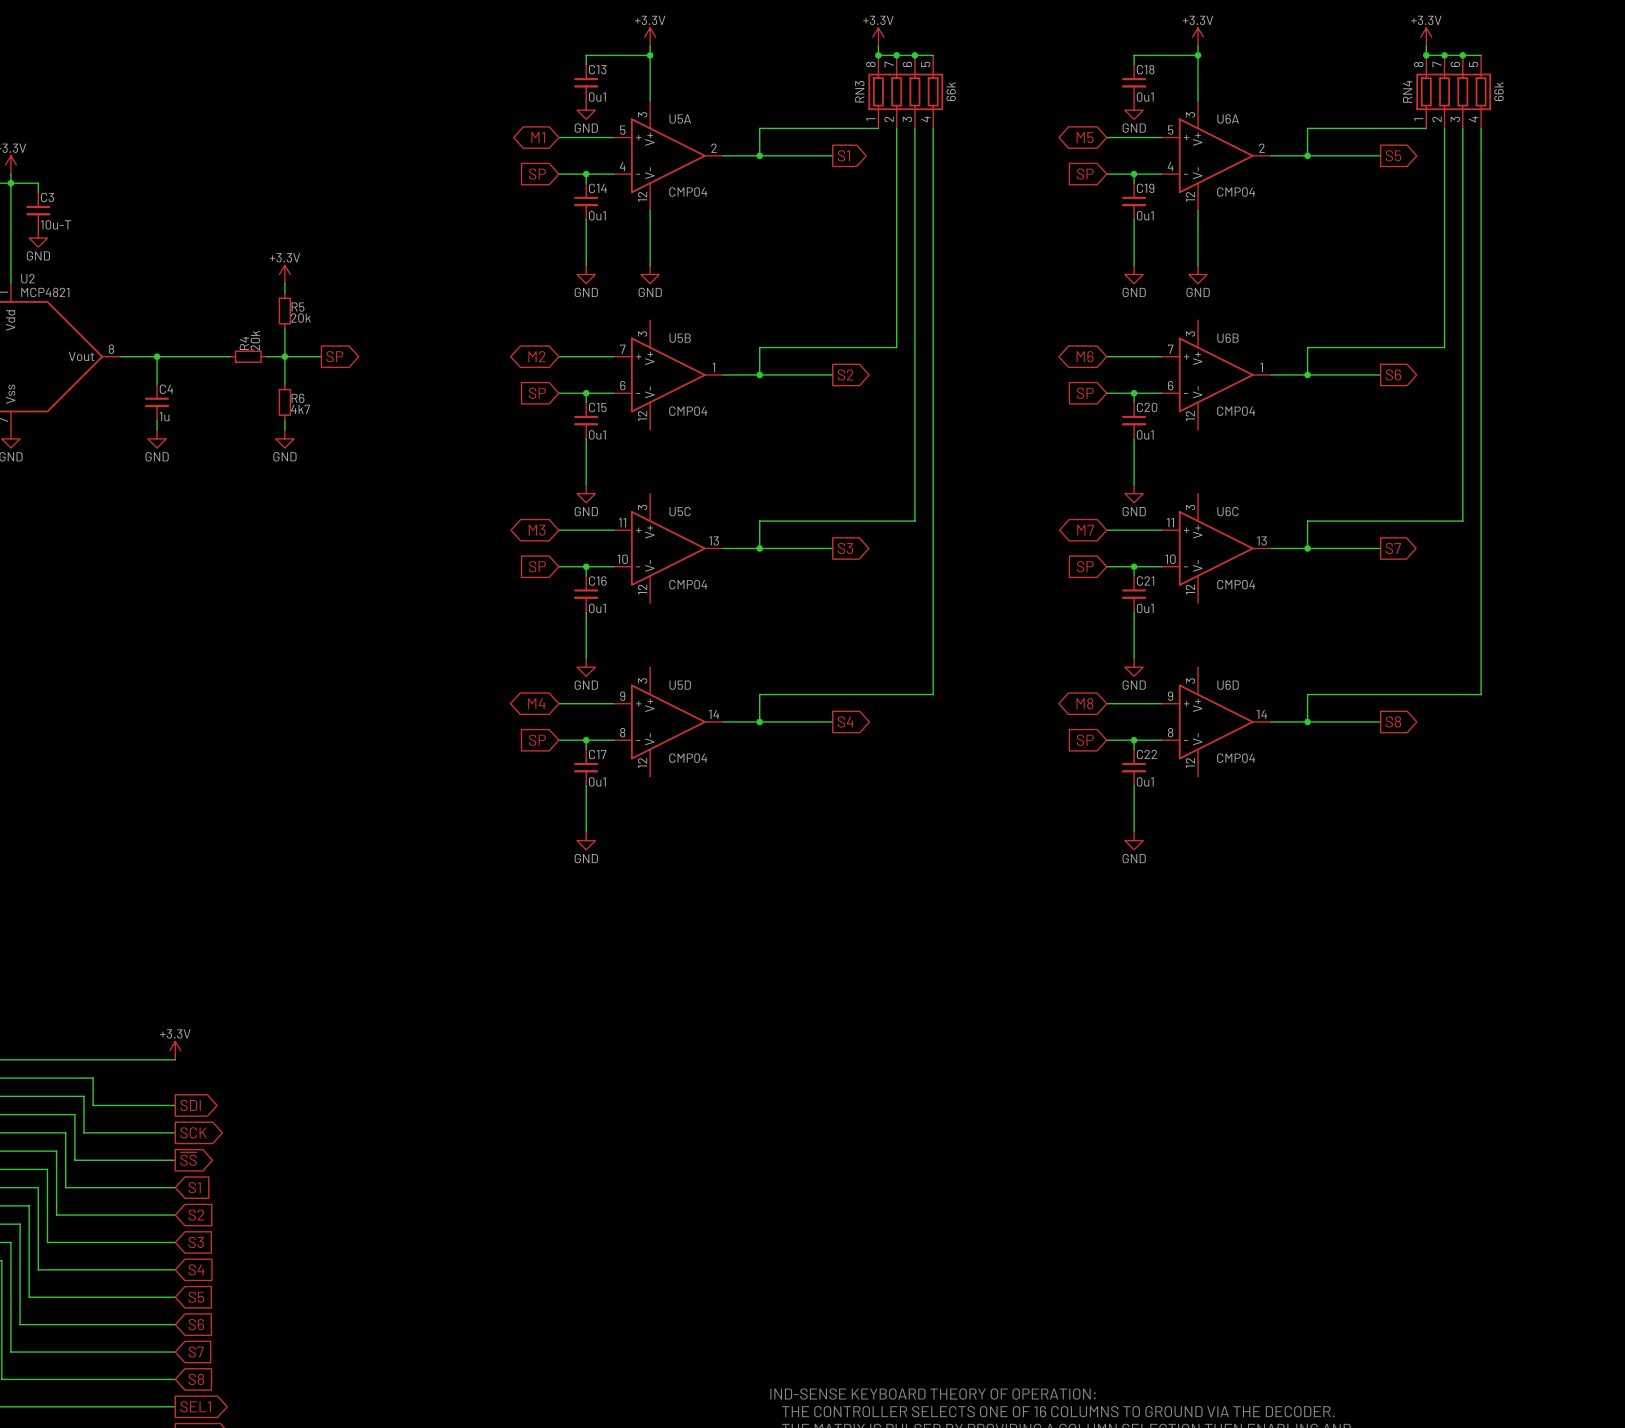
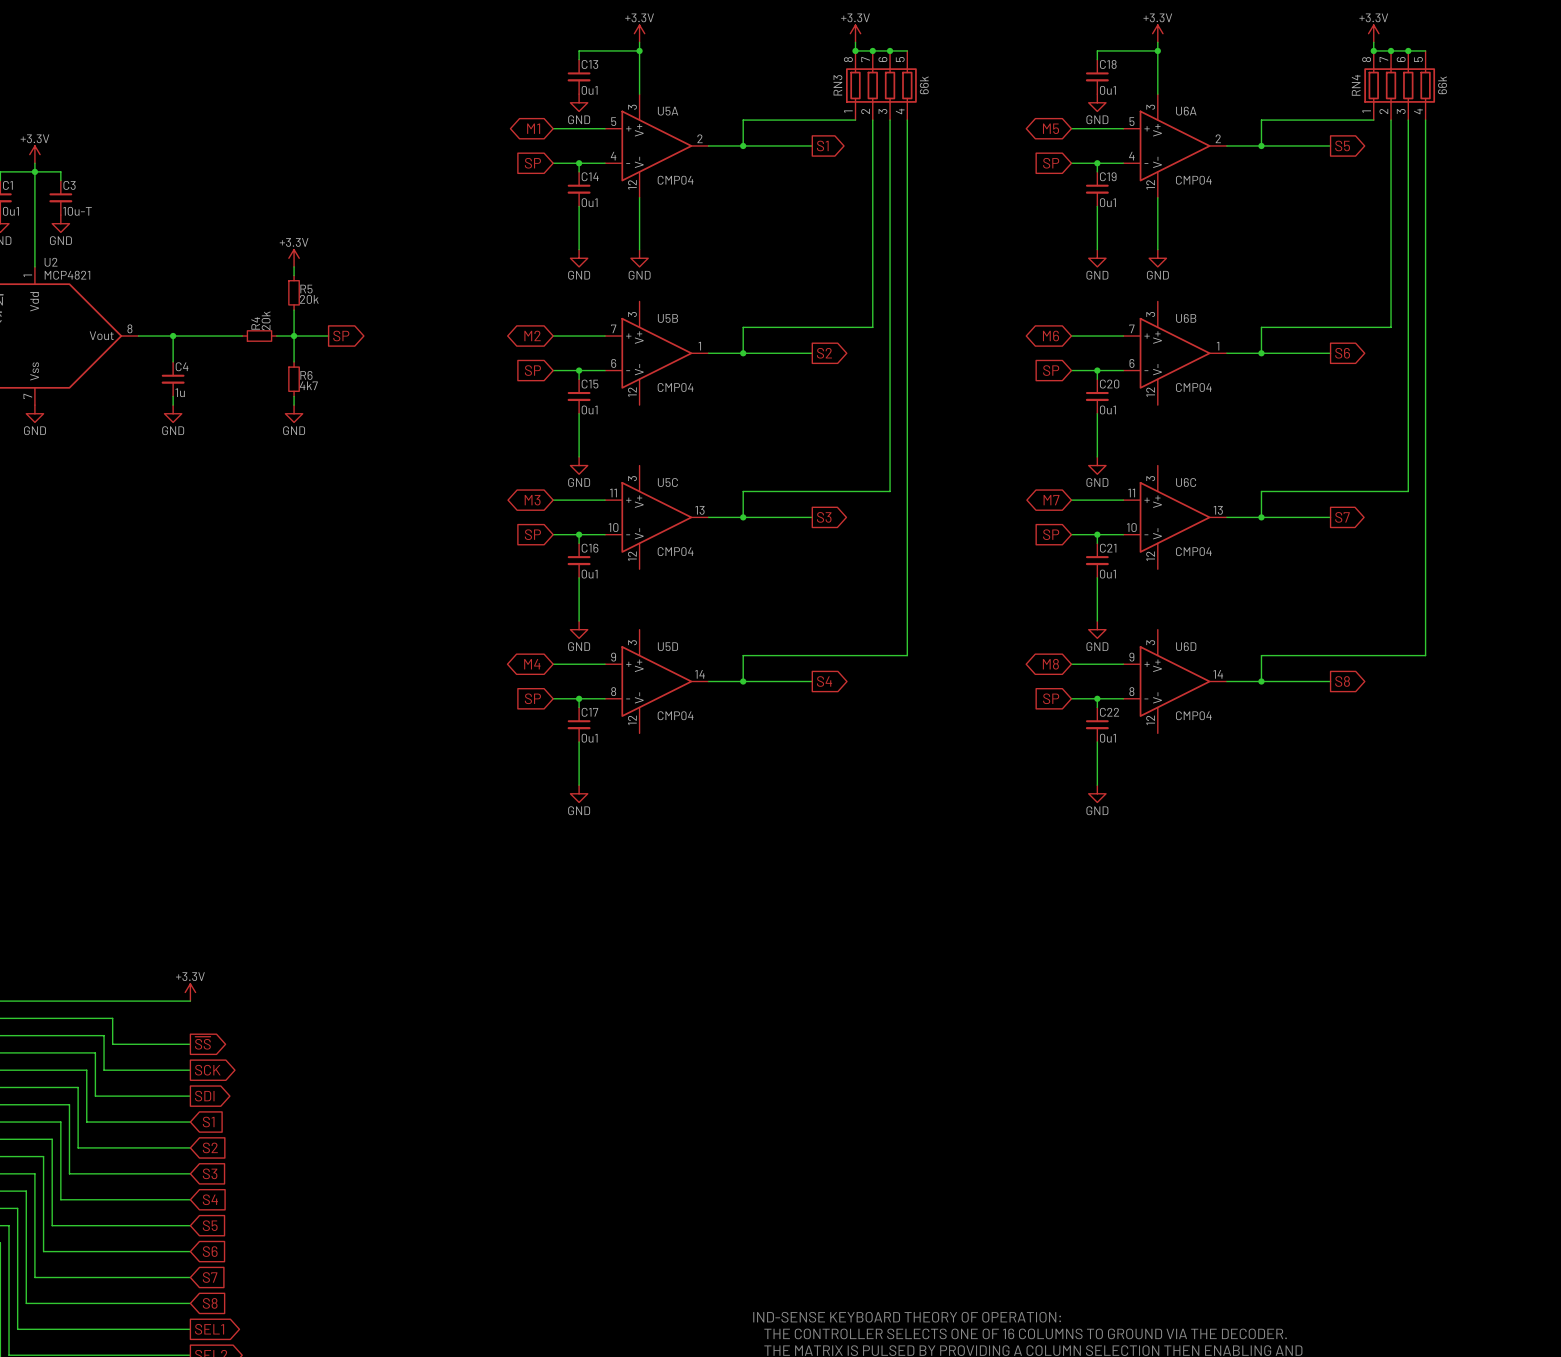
global label: SDI (190, 1105) -> ~{SS} (202, 1043)
global label: ~{SS} (188, 1159) -> SDI (204, 1096)

